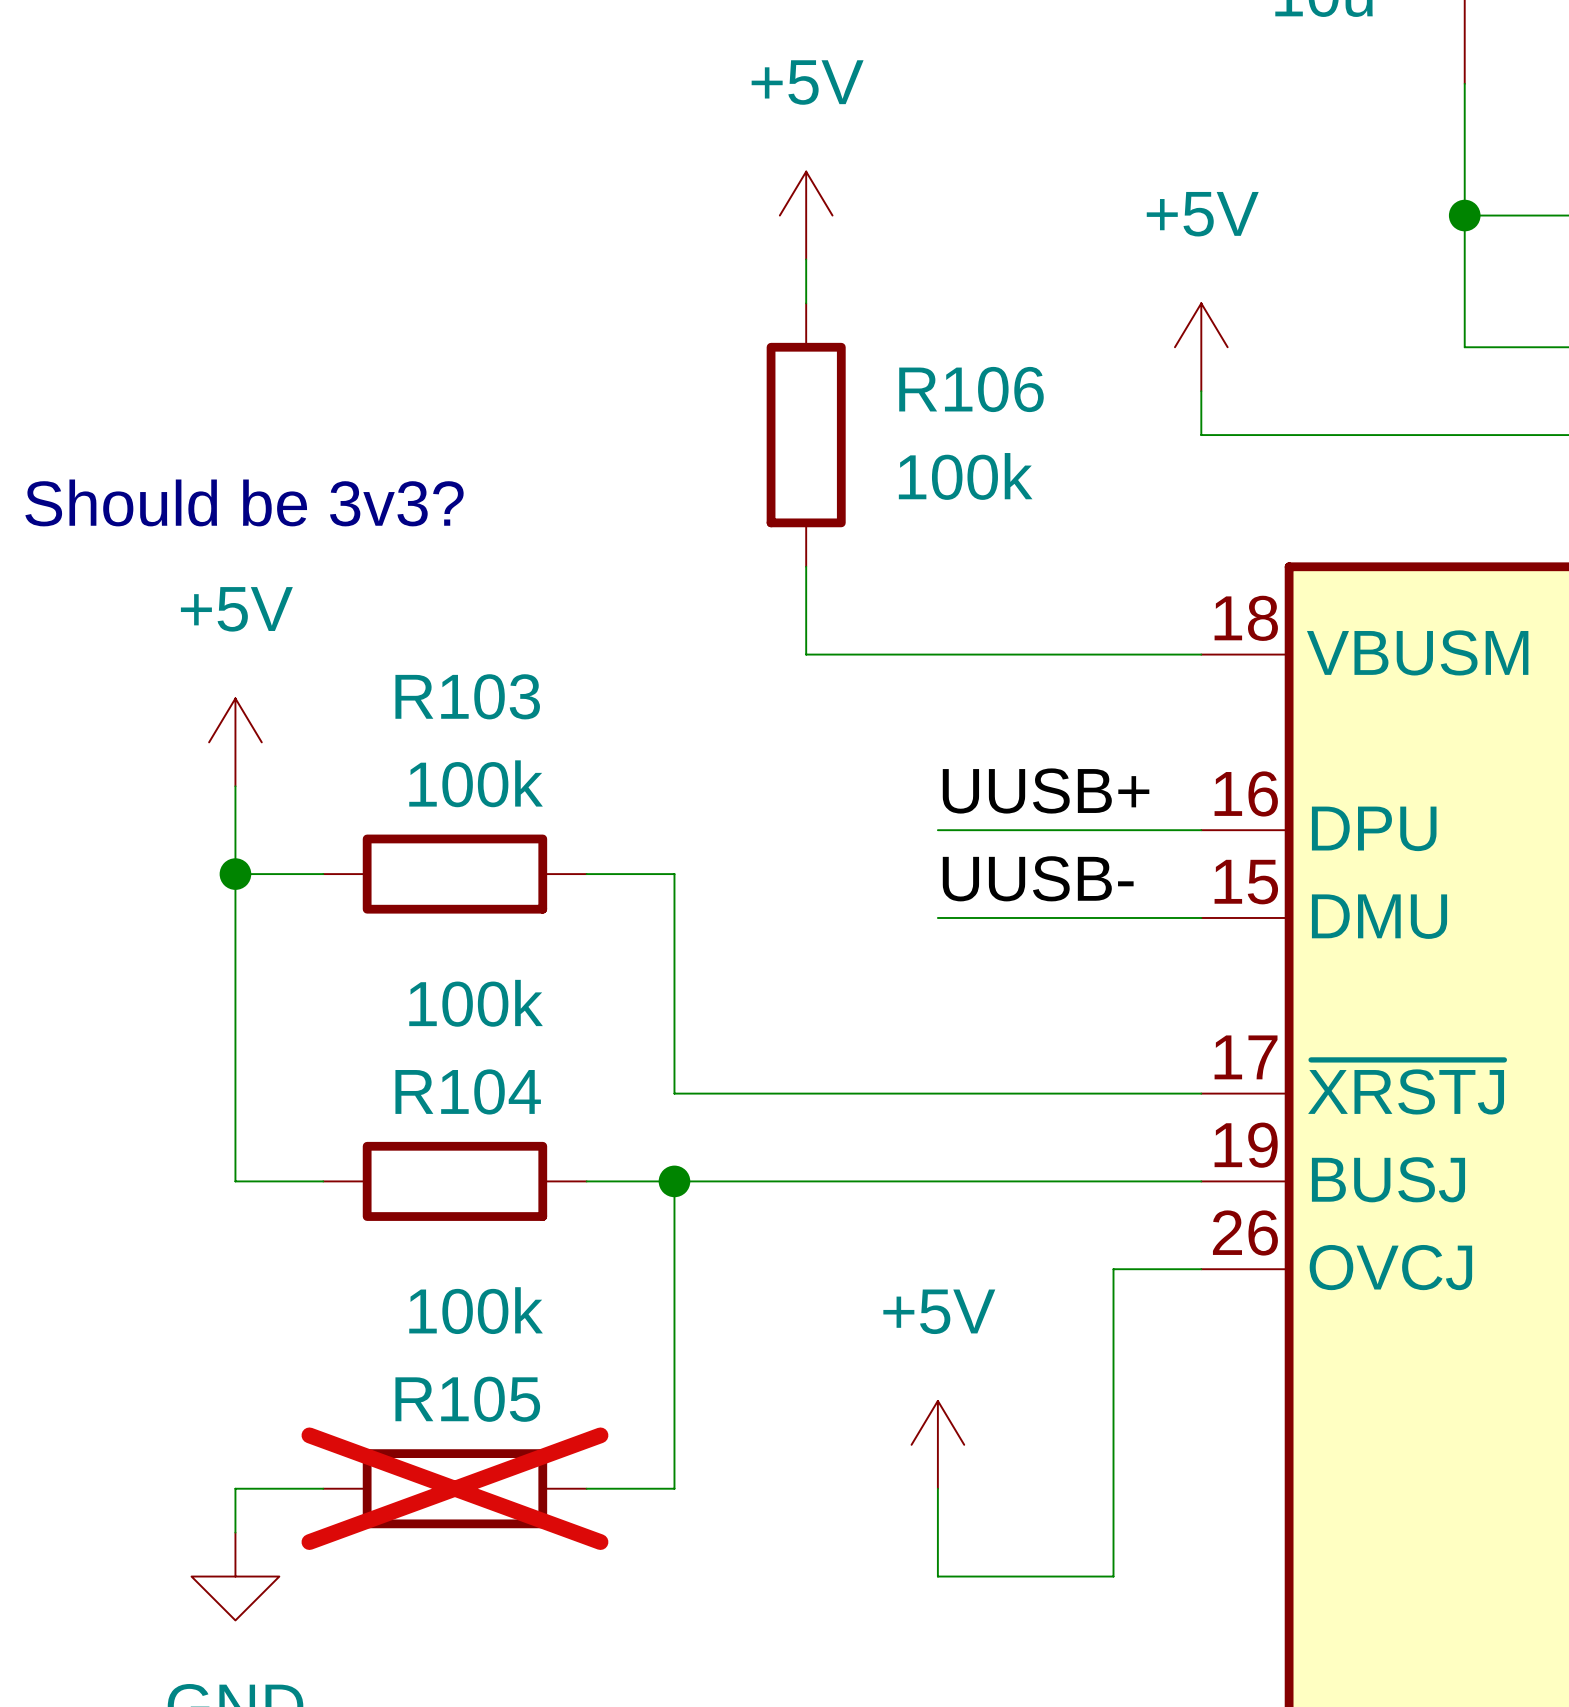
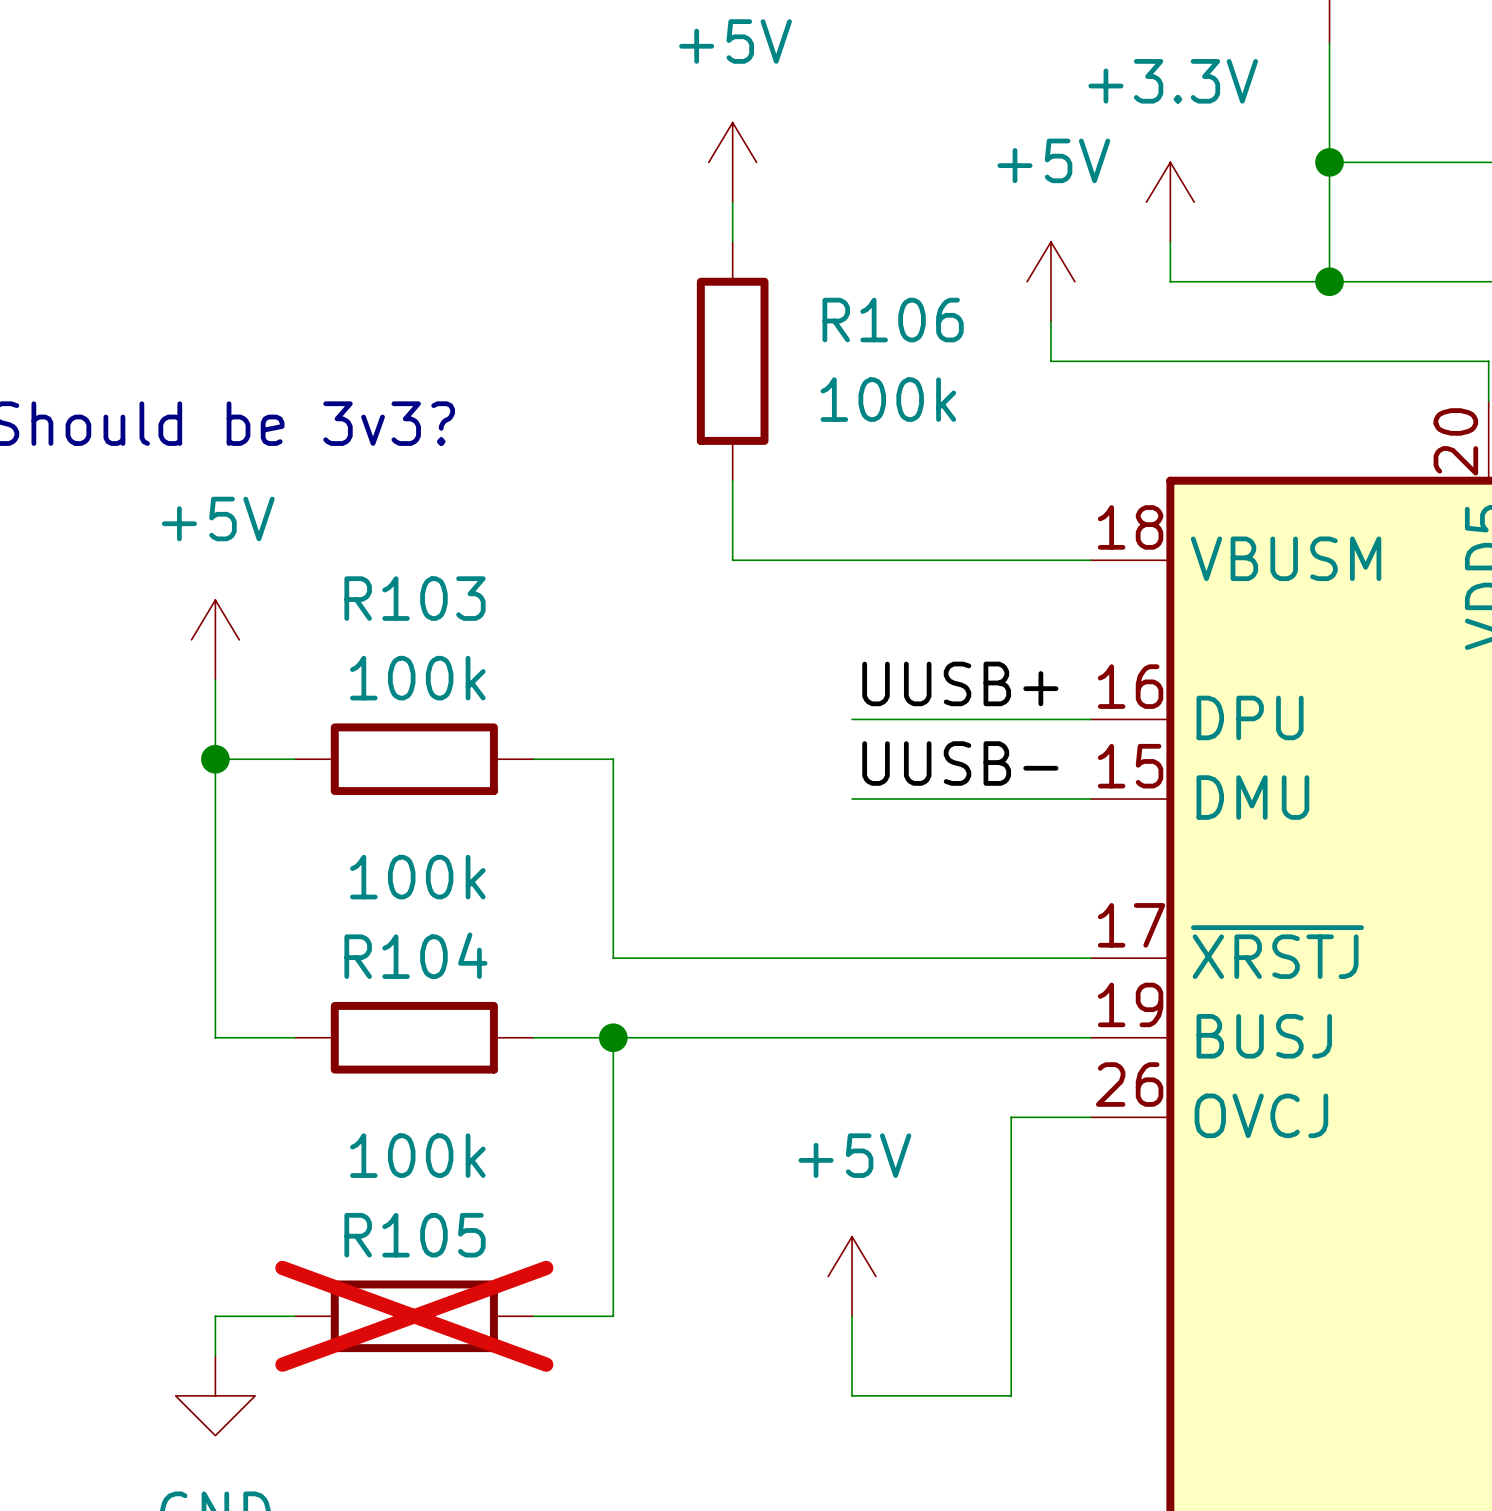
power symbol: none -> +3.3V (1170, 202)
wire: none -> (1170, 241) (1170, 281) (1329, 281)
power symbol position: +5V (1201, 347) -> +5V (1050, 281)
junction: none -> (1329, 281)
wire: (1201, 391) (1201, 435) -> (1050, 321) (1050, 361) (1090, 361)

